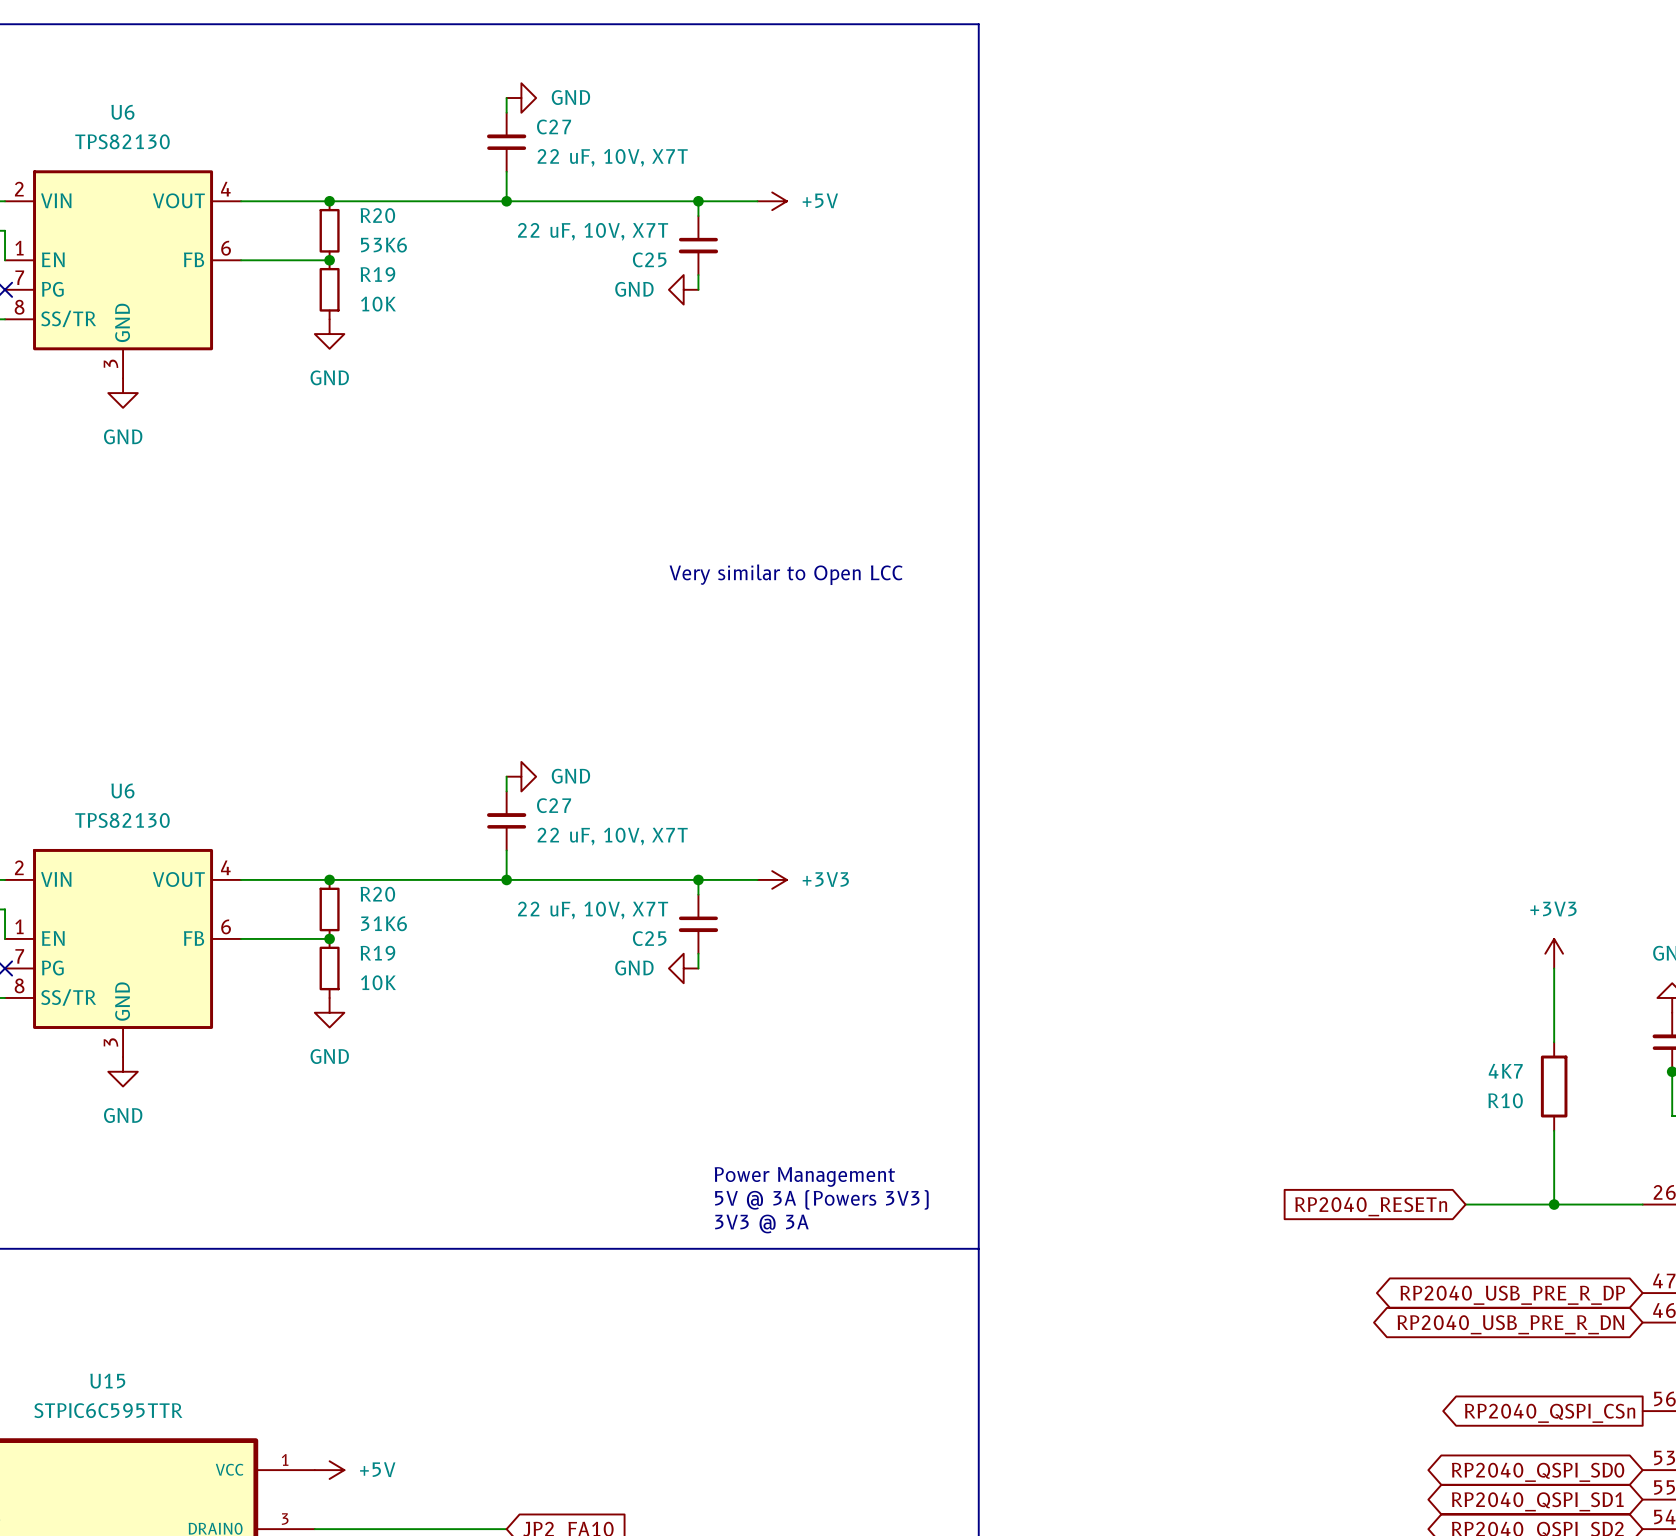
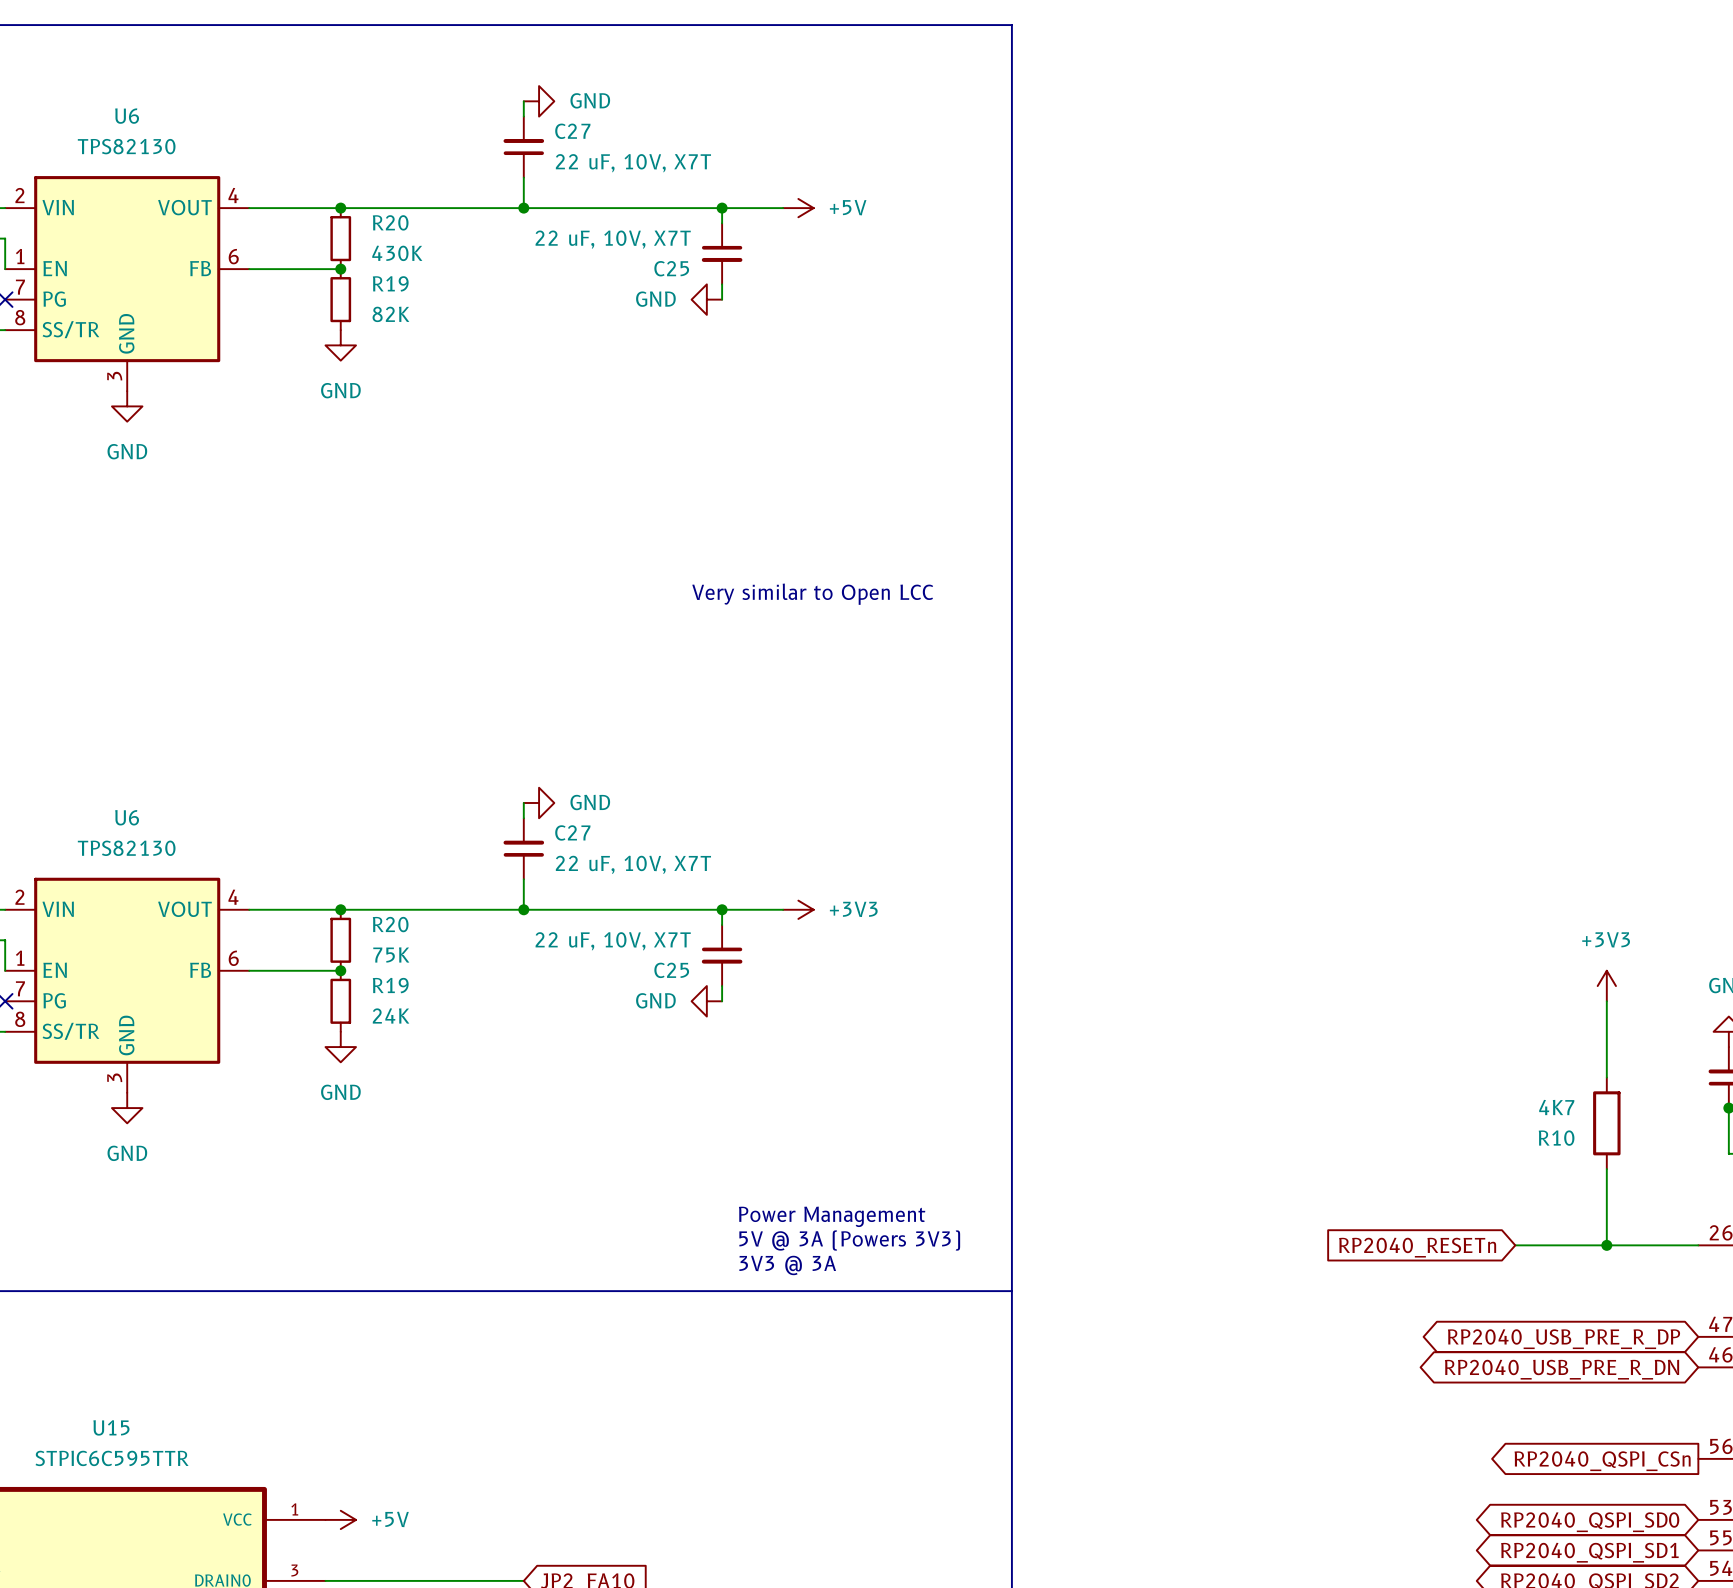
R20 value: 53K6 (383, 245) -> 430K (397, 253)
R19 value: 10K (378, 304) -> 82K (390, 314)
R20 value: 31K6 (383, 923) -> 75K (391, 954)
R19 value: 10K (378, 982) -> 24K (391, 1015)

